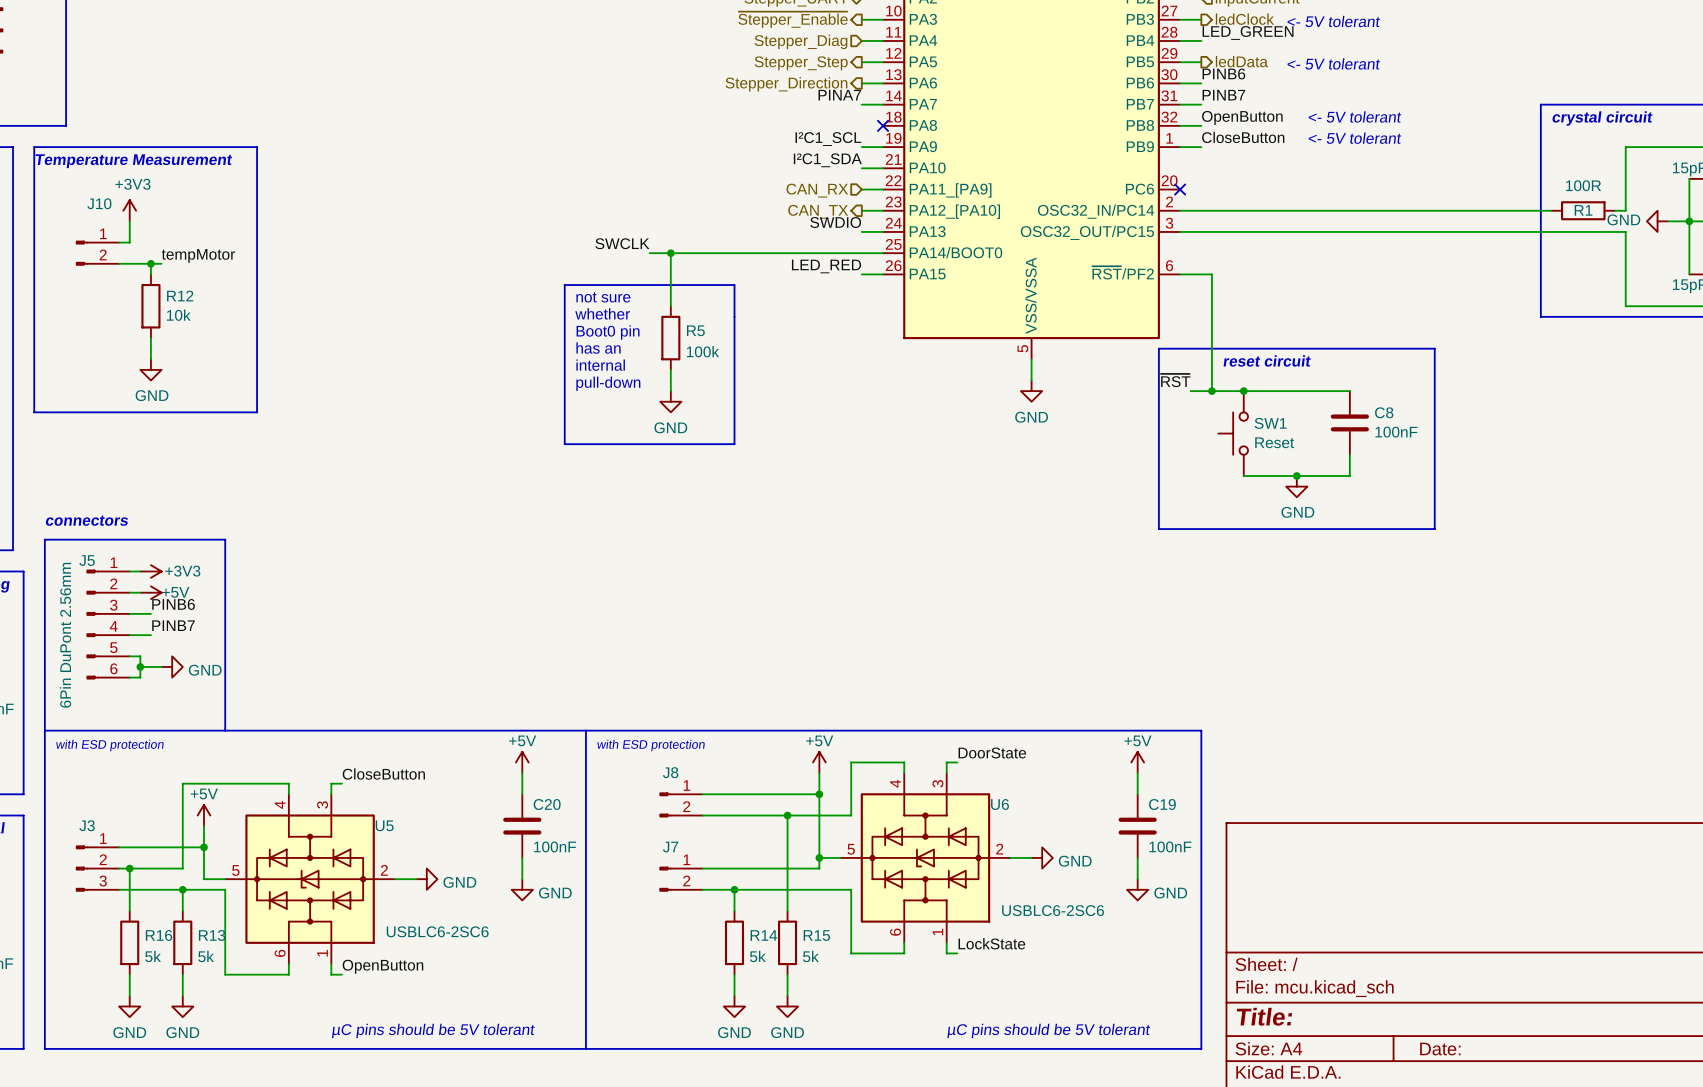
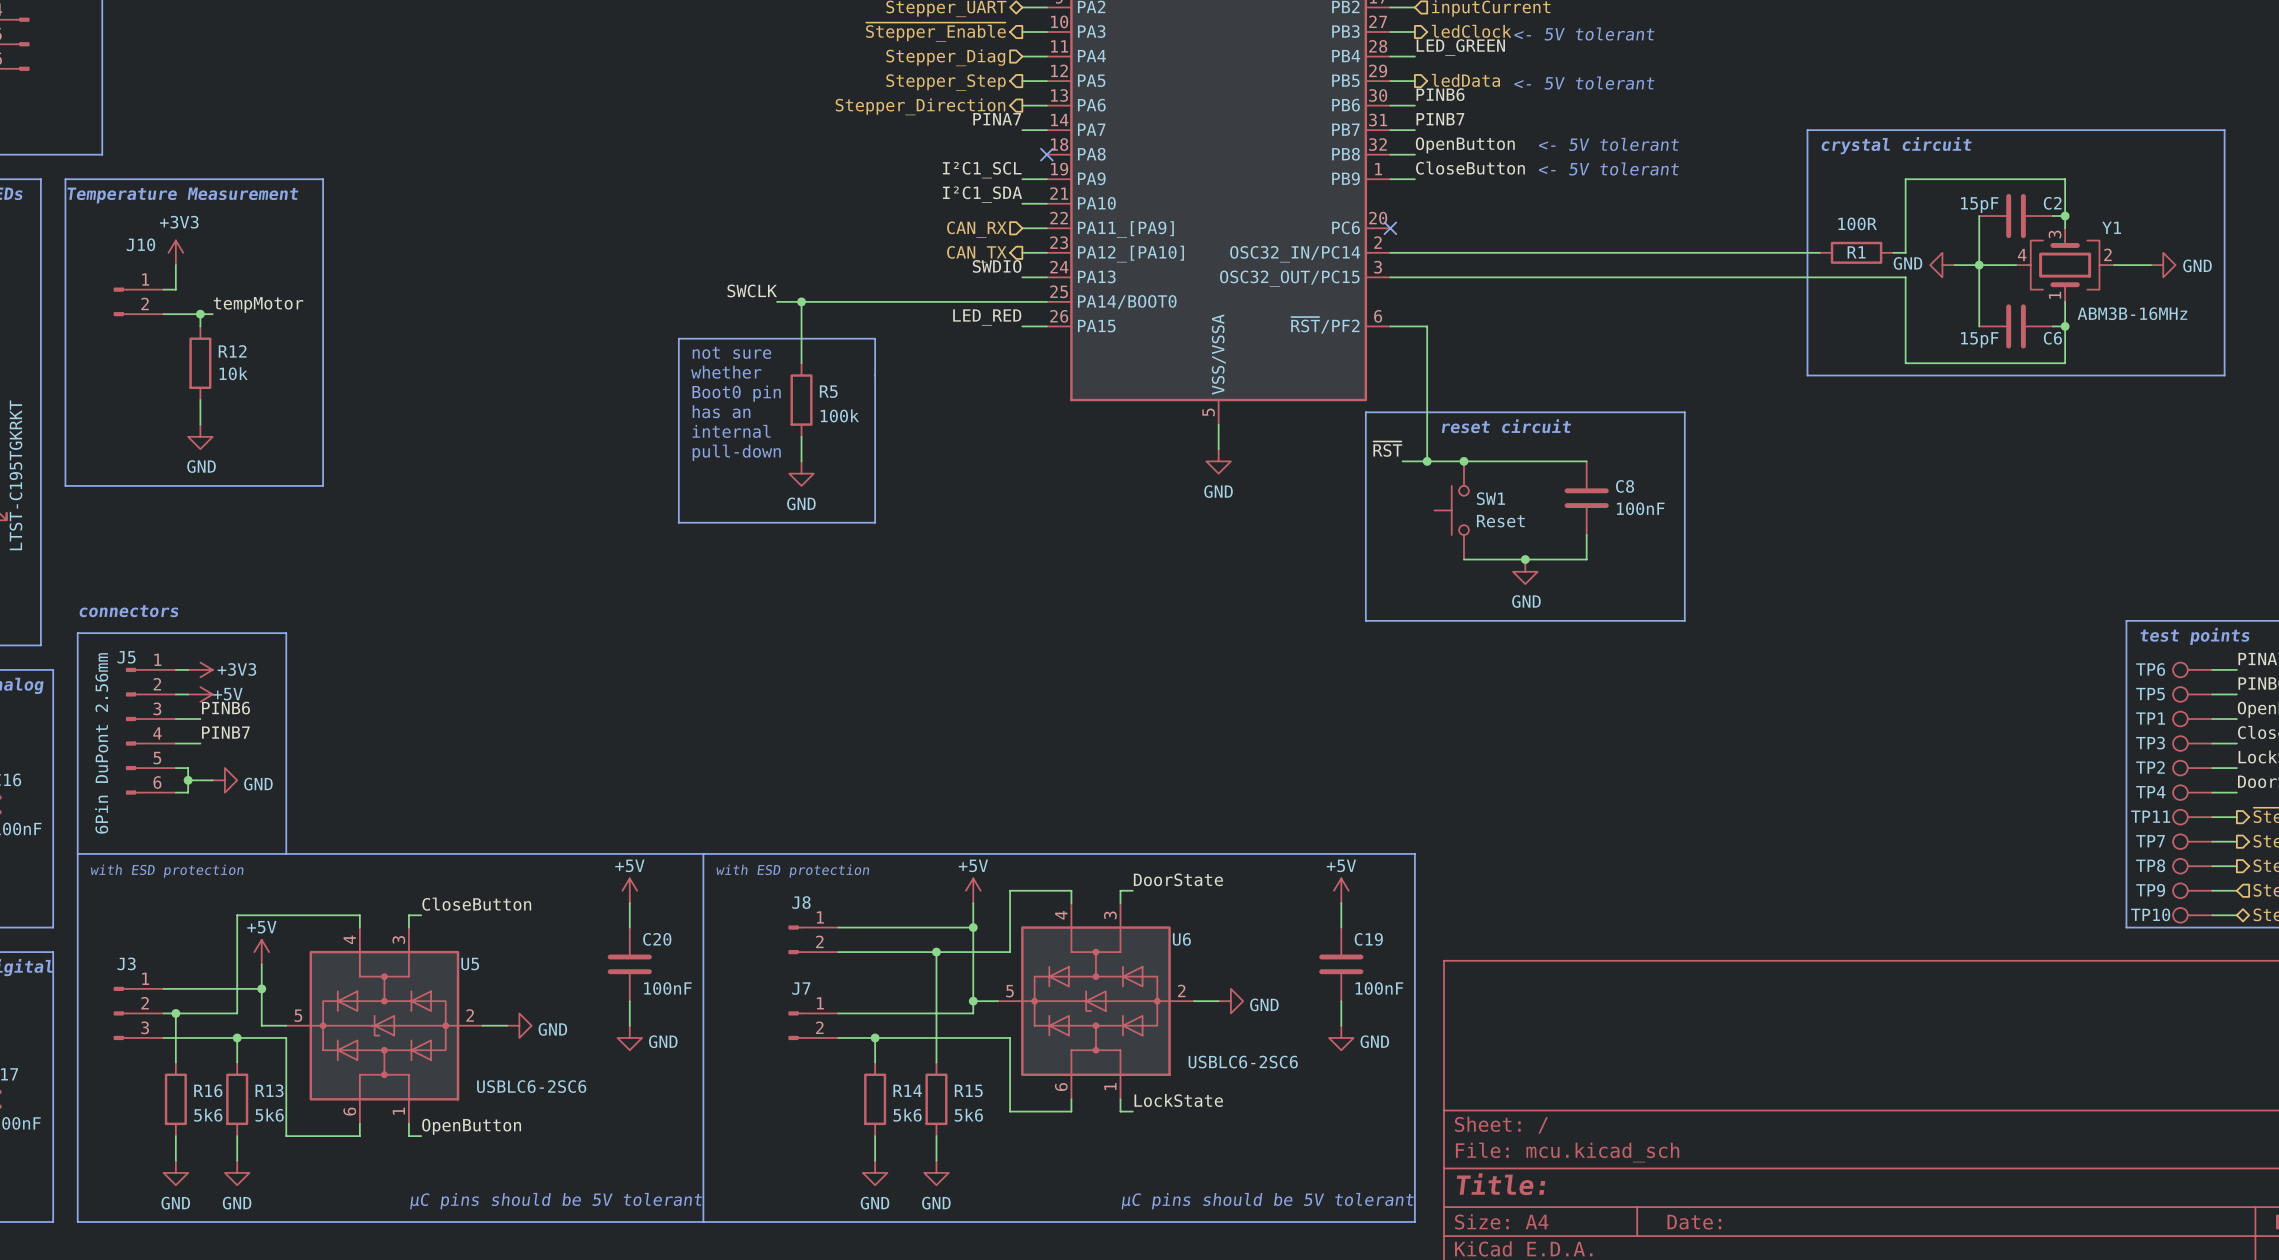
R16 value: 5k (153, 956) -> 5k6 (208, 1115)
R13 value: 5k (206, 956) -> 5k6 (269, 1115)
R14 value: 5k (757, 956) -> 5k6 (907, 1115)
R15 value: 5k (810, 956) -> 5k6 (968, 1115)

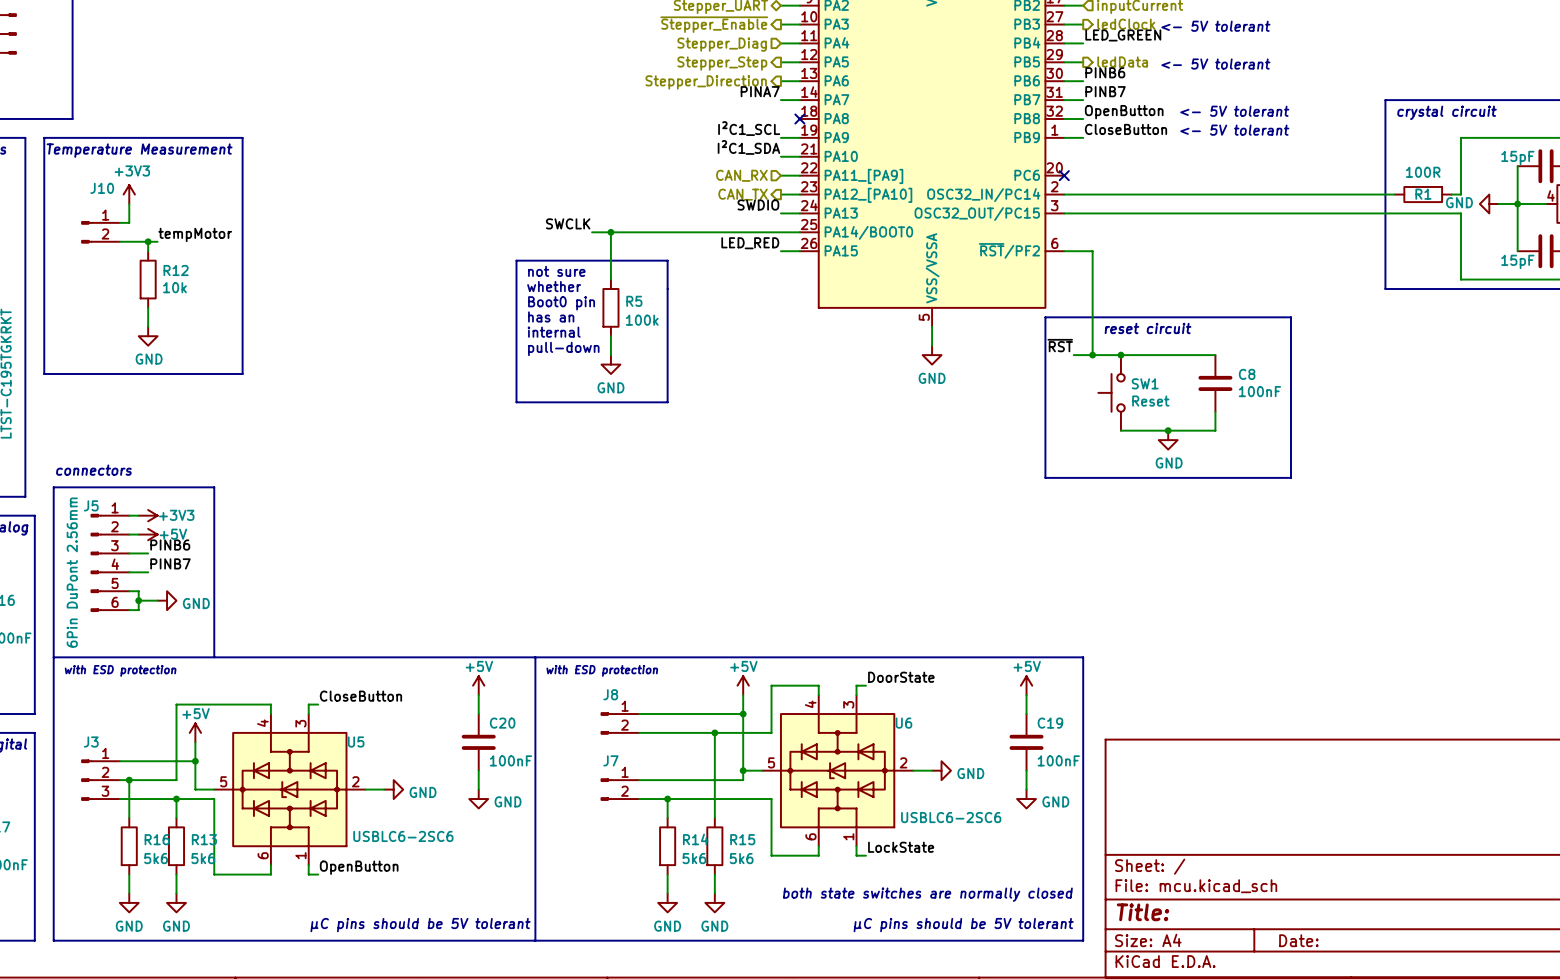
text: none -> both state switches are normally closed (927, 894)
text: none -> µC pins should be 5V tolerant (963, 925)
text: µC pins should be 5V tolerant (1267, 1201) -> none

